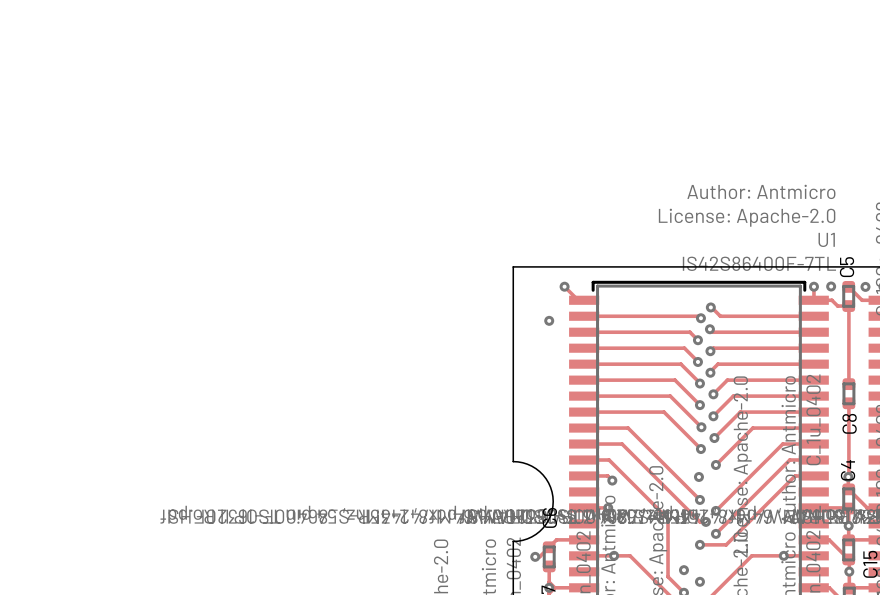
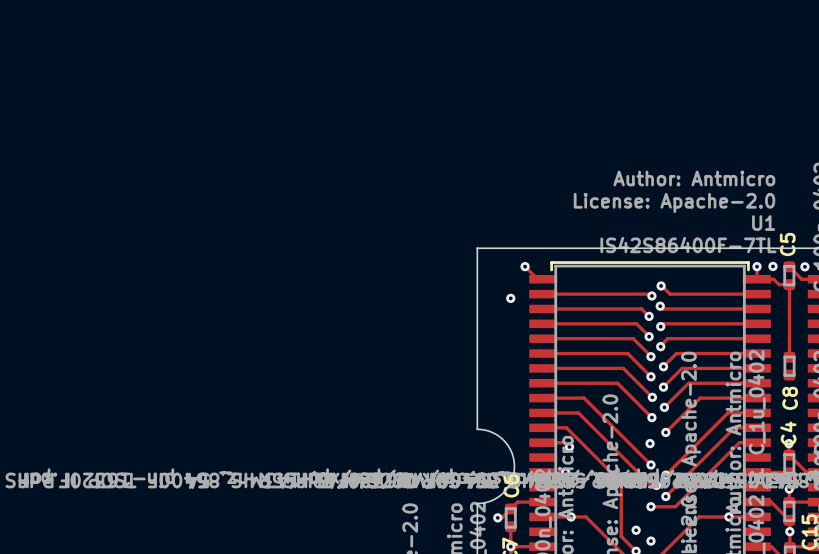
track: (848, 403) (848, 476) -> none

